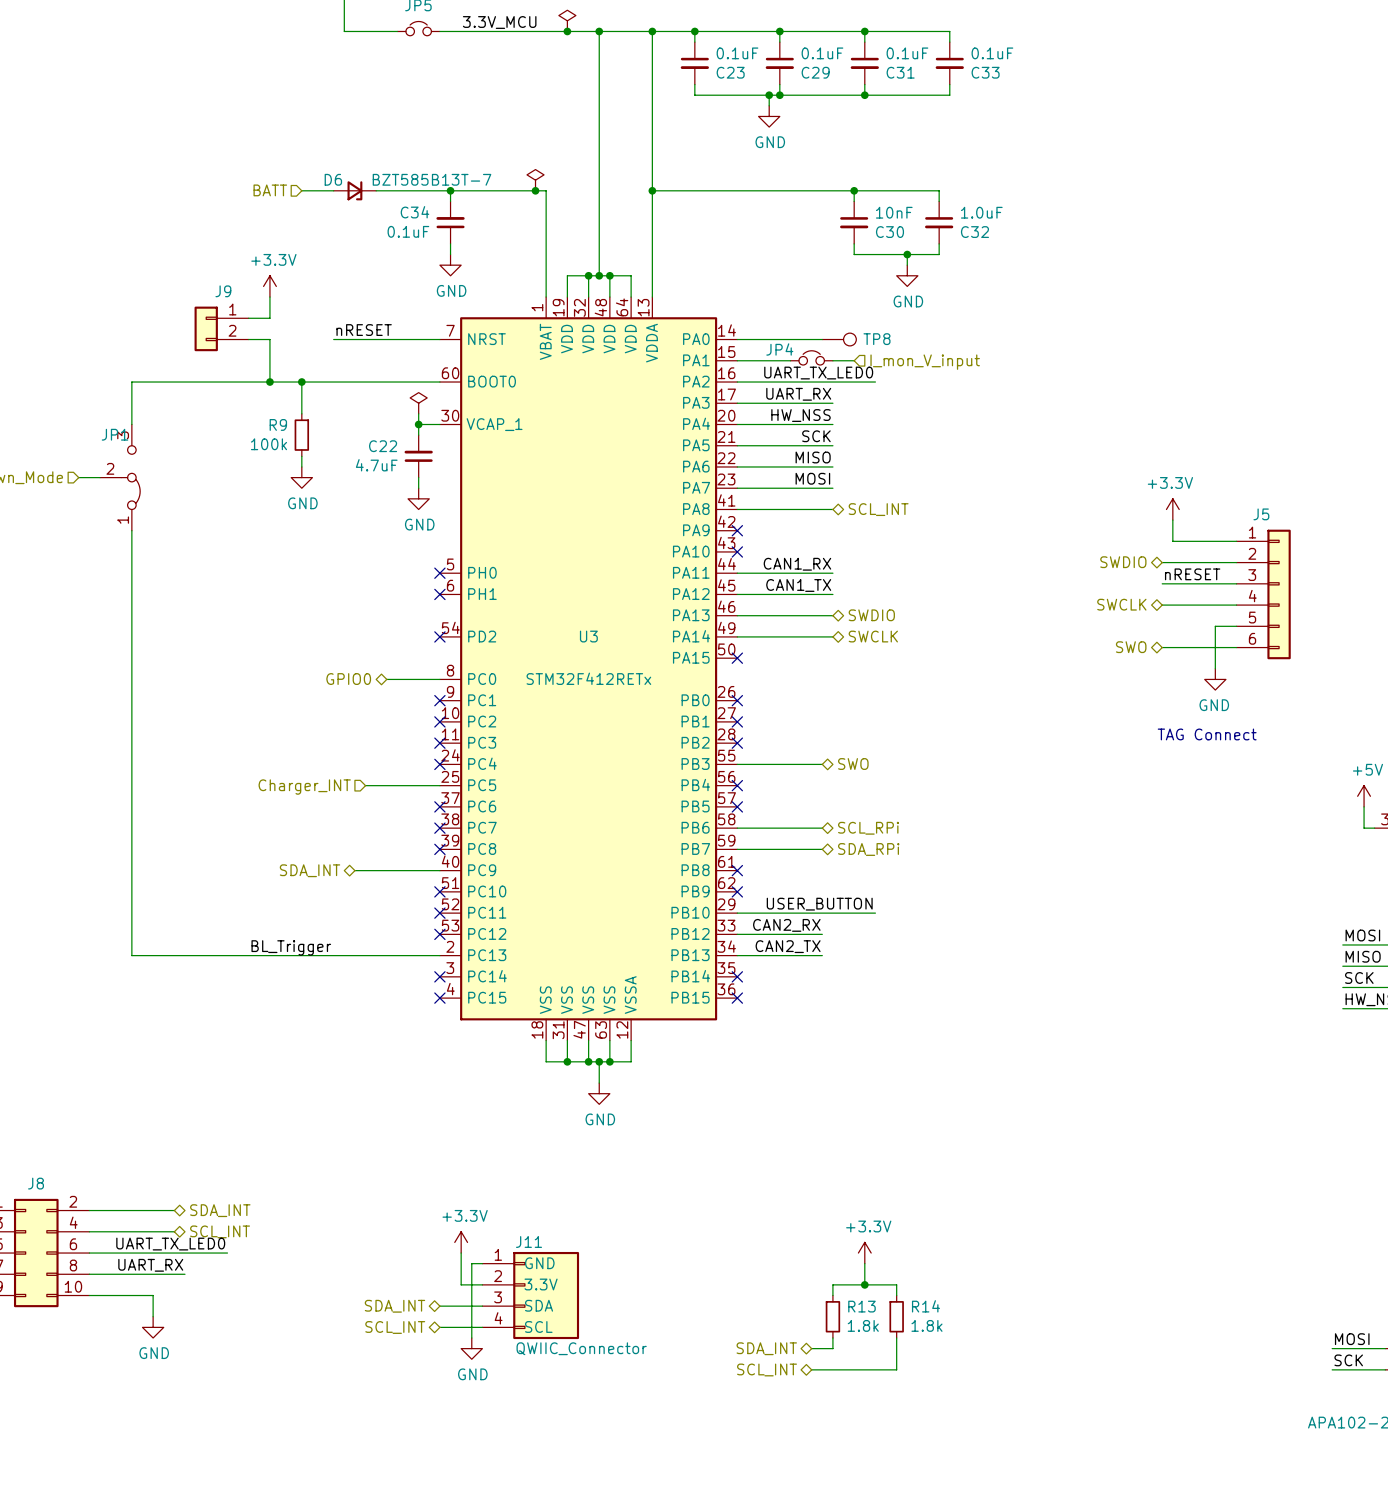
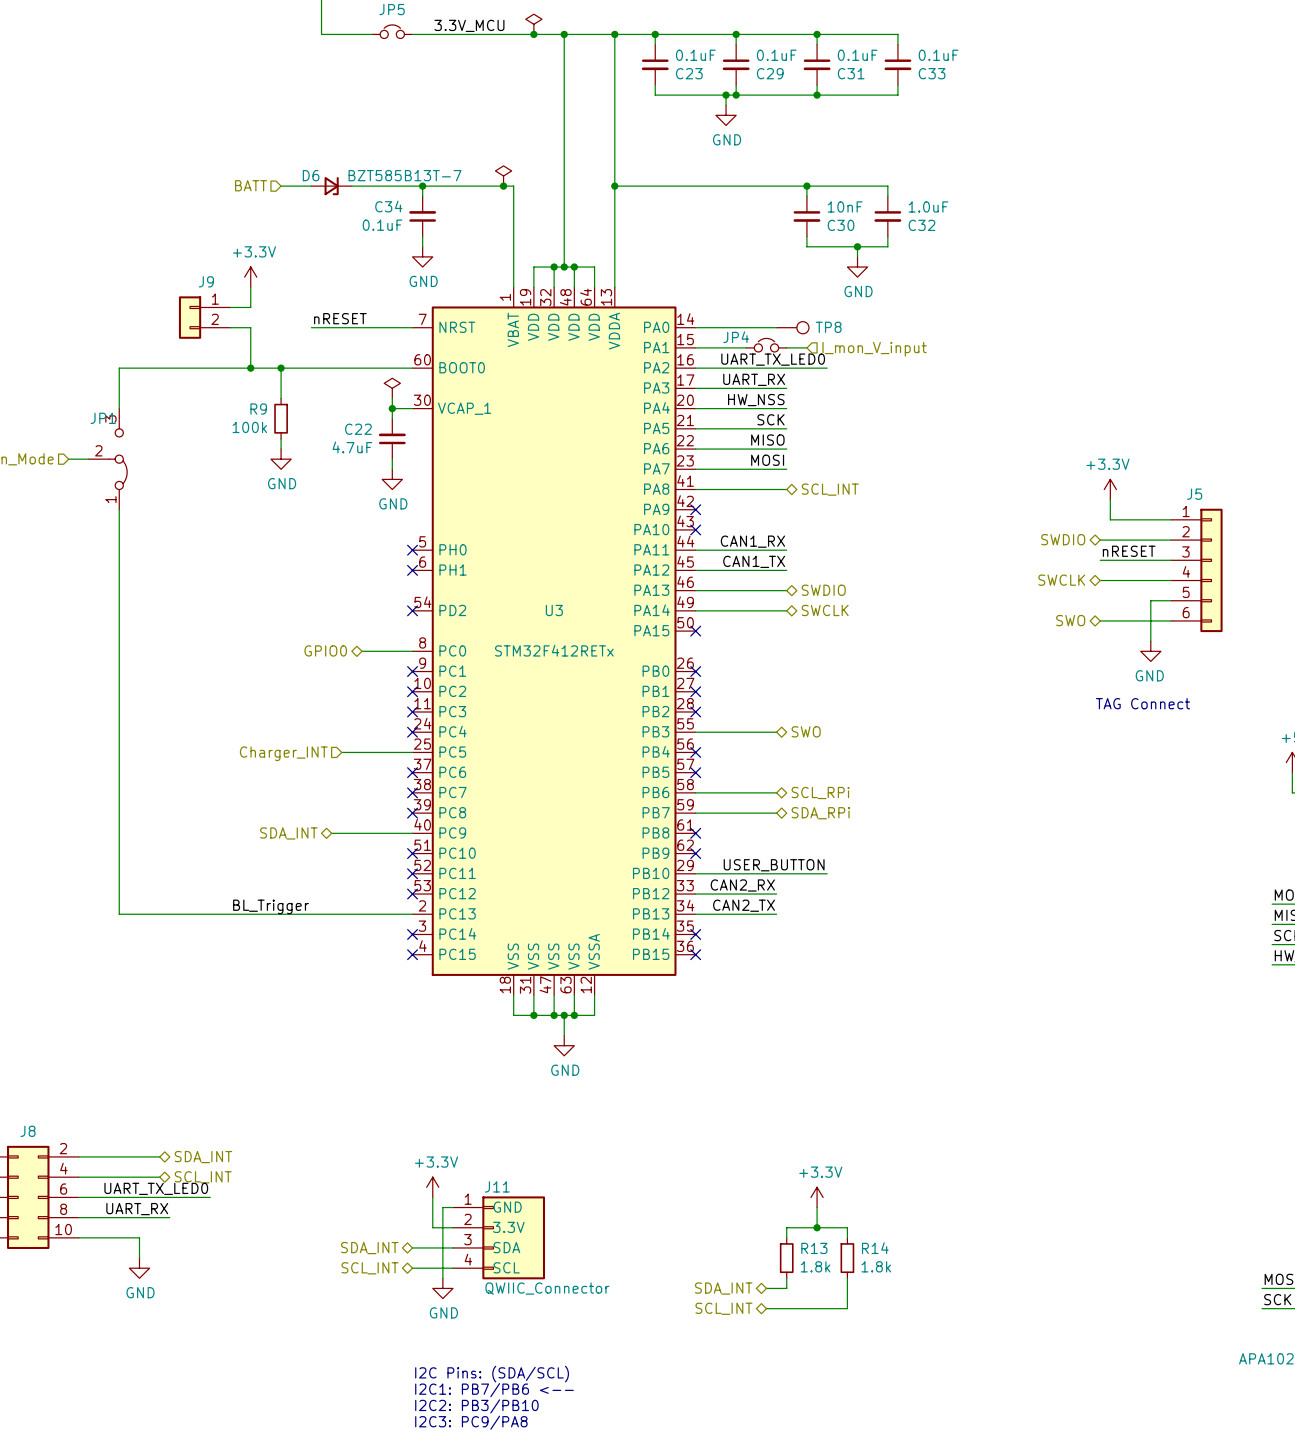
text: none -> I2C Pins: (SDA/SCL) (492, 1374)
text: none -> I2C1: PB7/PB6 <-- (494, 1390)
text: none -> I2C2: PB3/PB10 (476, 1406)
text: none -> I2C3: PC9/PA8 (471, 1422)

